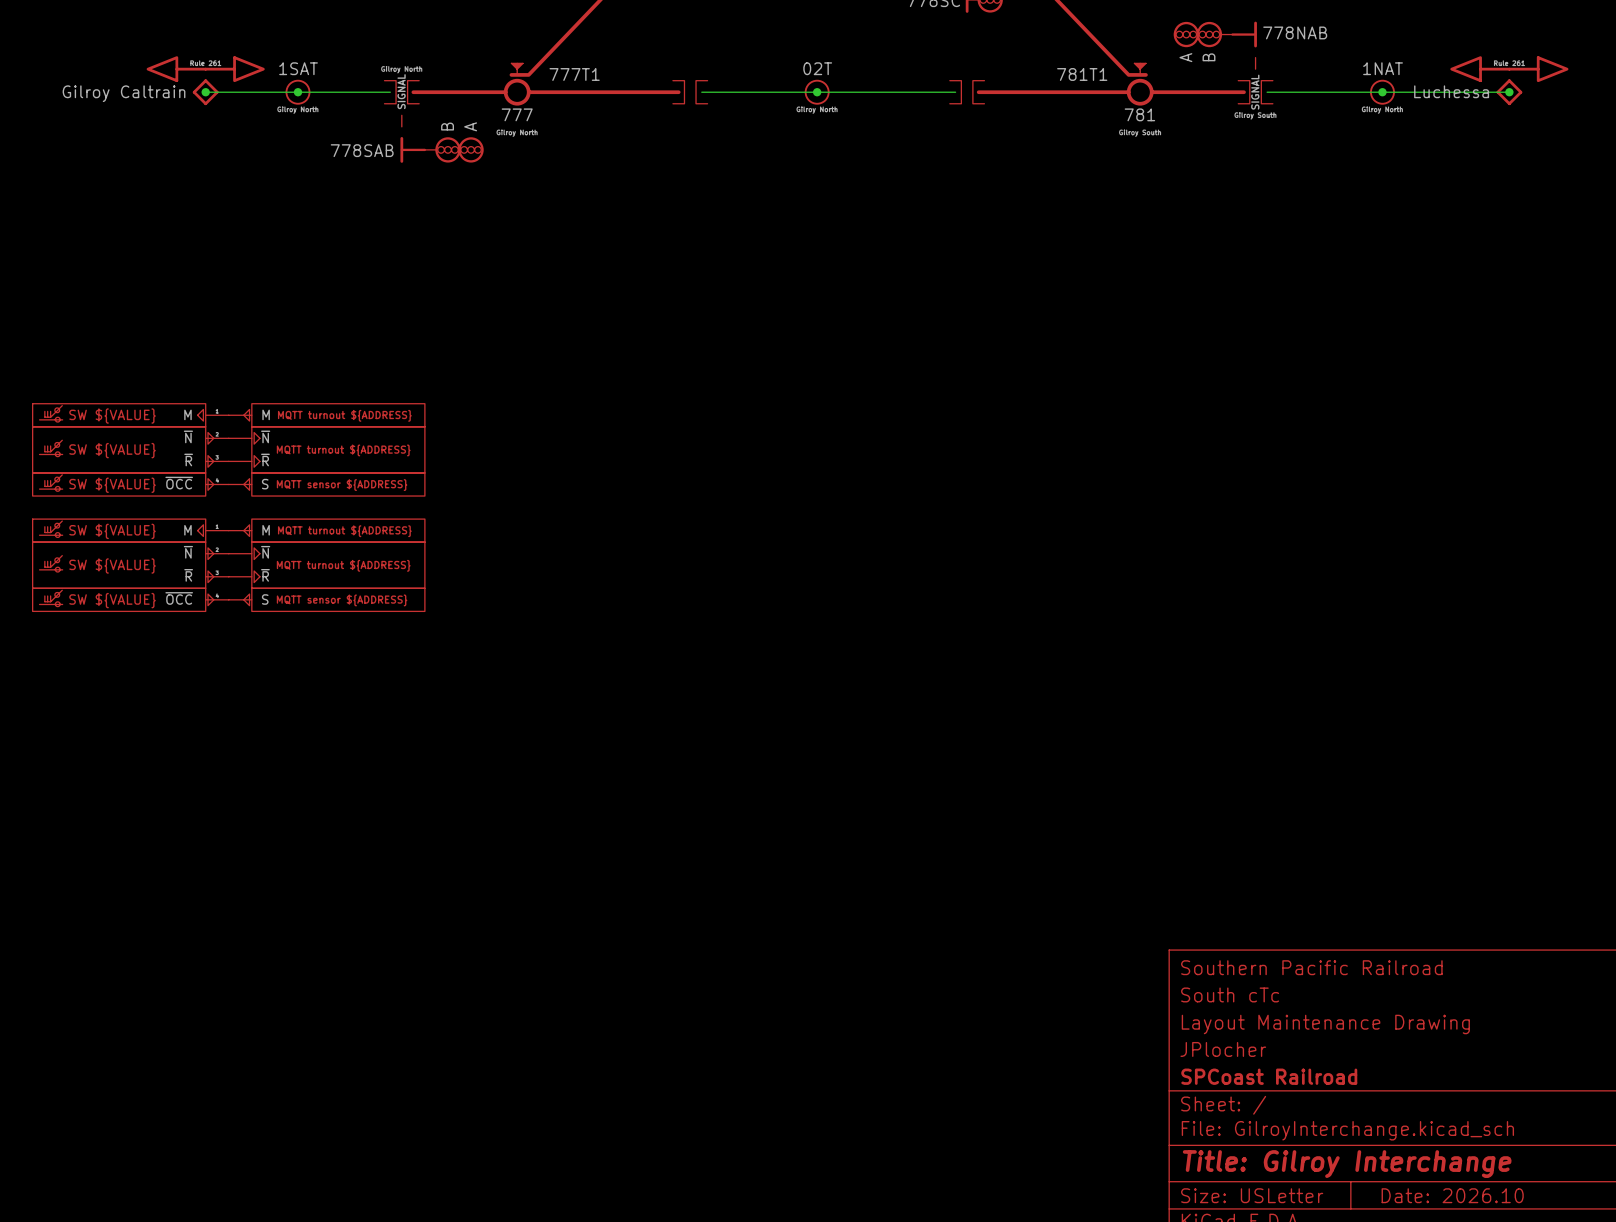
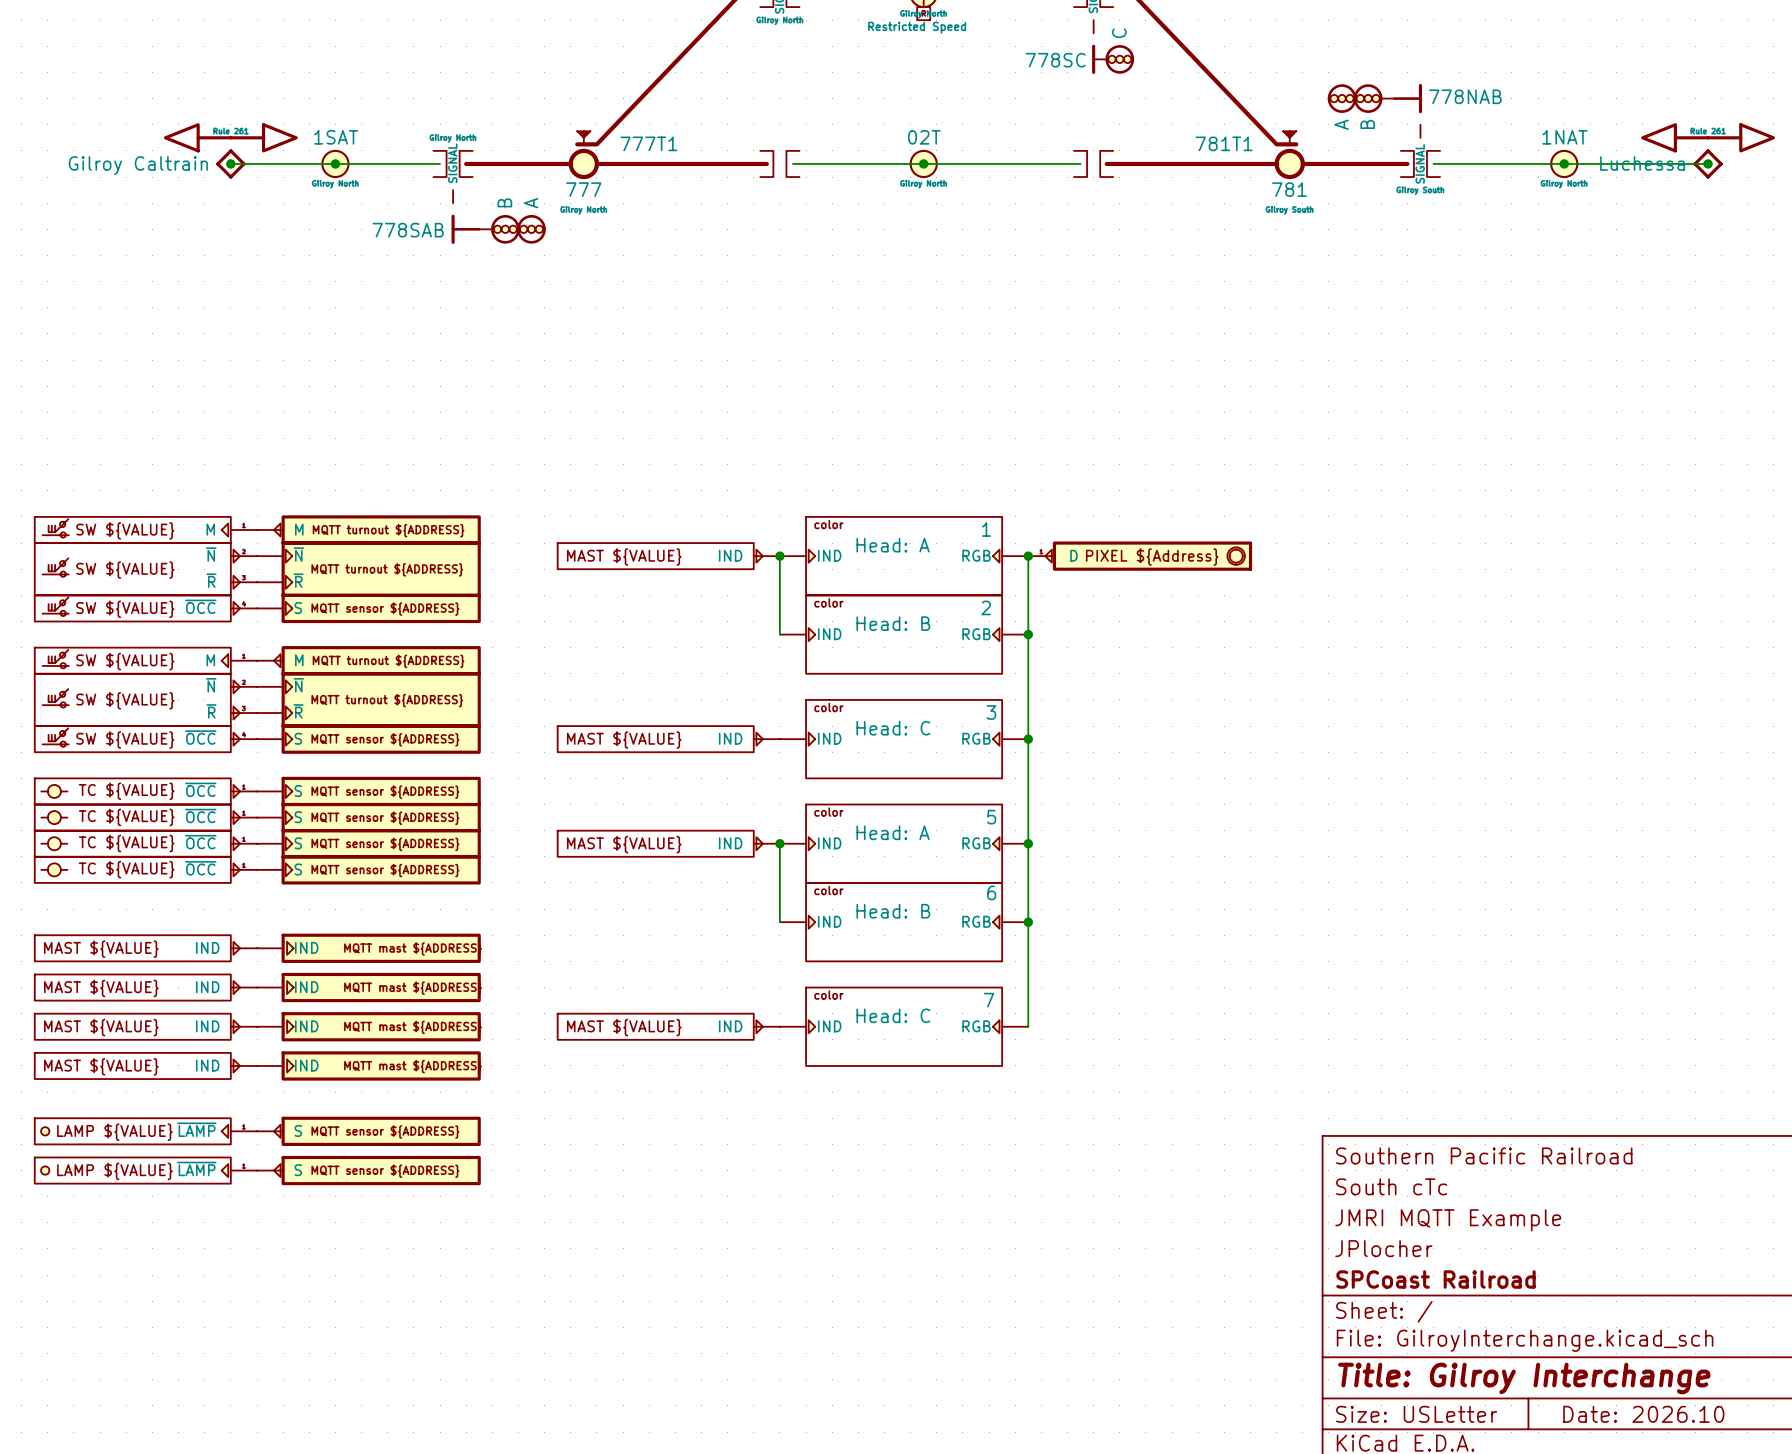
part symbol: [228, 403, 425, 427] -> [257, 515, 481, 545]
part symbol: [228, 426, 425, 473] -> [257, 541, 481, 597]
part: none -> (668, 556)
wire: none -> (779, 556) (779, 634)
junction: none -> (779, 556)
part: none -> (904, 556)
wire: none -> (1028, 556) (1028, 1026)
junction: none -> (1028, 556)
part: none -> (1140, 556)
part symbol: [228, 472, 425, 497] -> [257, 593, 481, 624]
part: none -> (904, 634)
junction: none -> (1028, 634)
part symbol: [228, 519, 425, 543] -> [257, 646, 481, 676]
part symbol: [228, 542, 425, 589] -> [257, 672, 481, 728]
part symbol: [228, 588, 425, 612] -> [257, 724, 481, 754]
part: none -> (668, 739)
part: none -> (904, 739)
junction: none -> (1028, 739)
part: none -> (145, 791)
part: none -> (368, 791)
part: none -> (145, 817)
part: none -> (368, 817)
part: none -> (145, 843)
part: none -> (368, 843)
part: none -> (668, 843)
wire: none -> (779, 843) (779, 922)
junction: none -> (779, 843)
part: none -> (904, 843)
junction: none -> (1028, 843)
part: none -> (145, 869)
part: none -> (368, 869)
part: none -> (904, 922)
junction: none -> (1028, 922)
part: none -> (145, 948)
part: none -> (368, 948)
part: none -> (145, 987)
part: none -> (368, 987)
part: none -> (145, 1026)
part: none -> (368, 1026)
part: none -> (668, 1026)
part: none -> (904, 1026)
part: none -> (145, 1065)
part: none -> (368, 1065)
part: none -> (145, 1131)
part: none -> (368, 1131)
part: none -> (145, 1170)
part: none -> (368, 1170)
title block: Layout Maintenance Drawing (1325, 1024) -> JMRI MQTT Example (1448, 1220)

